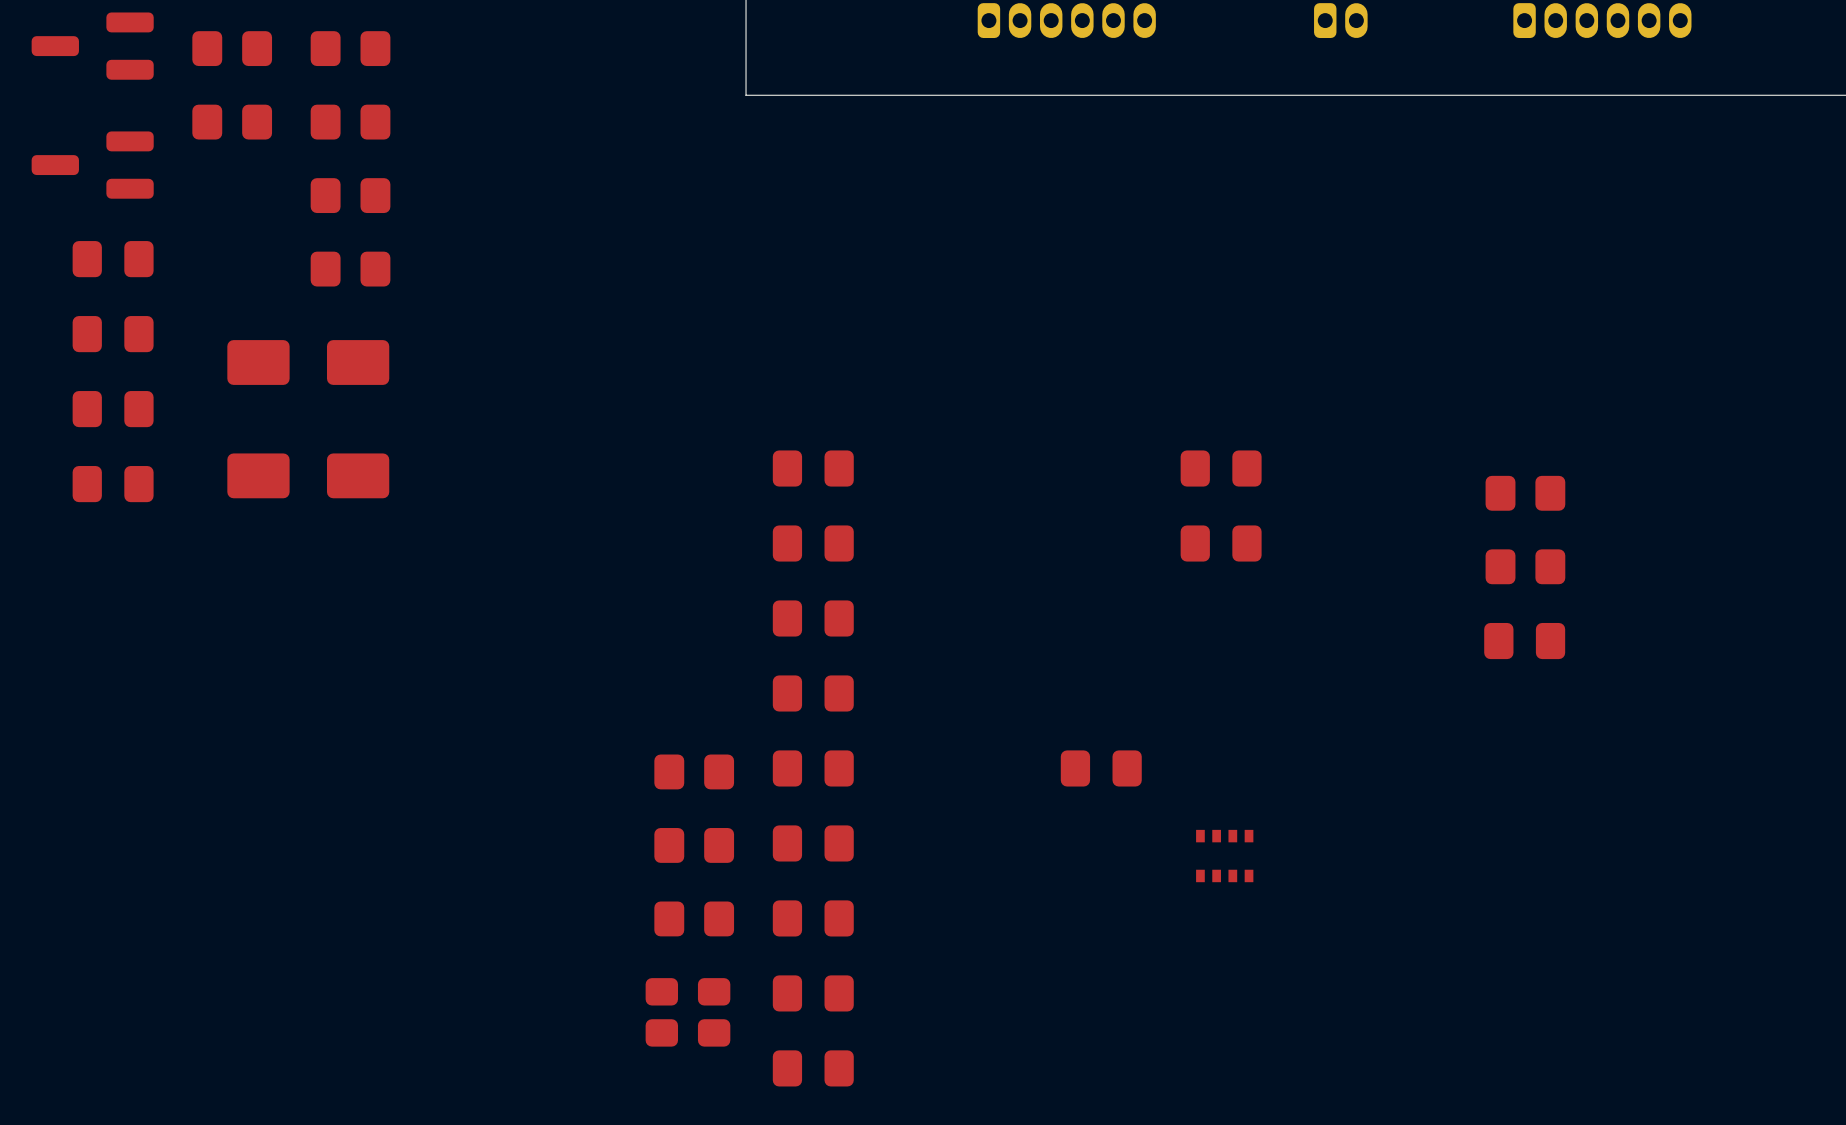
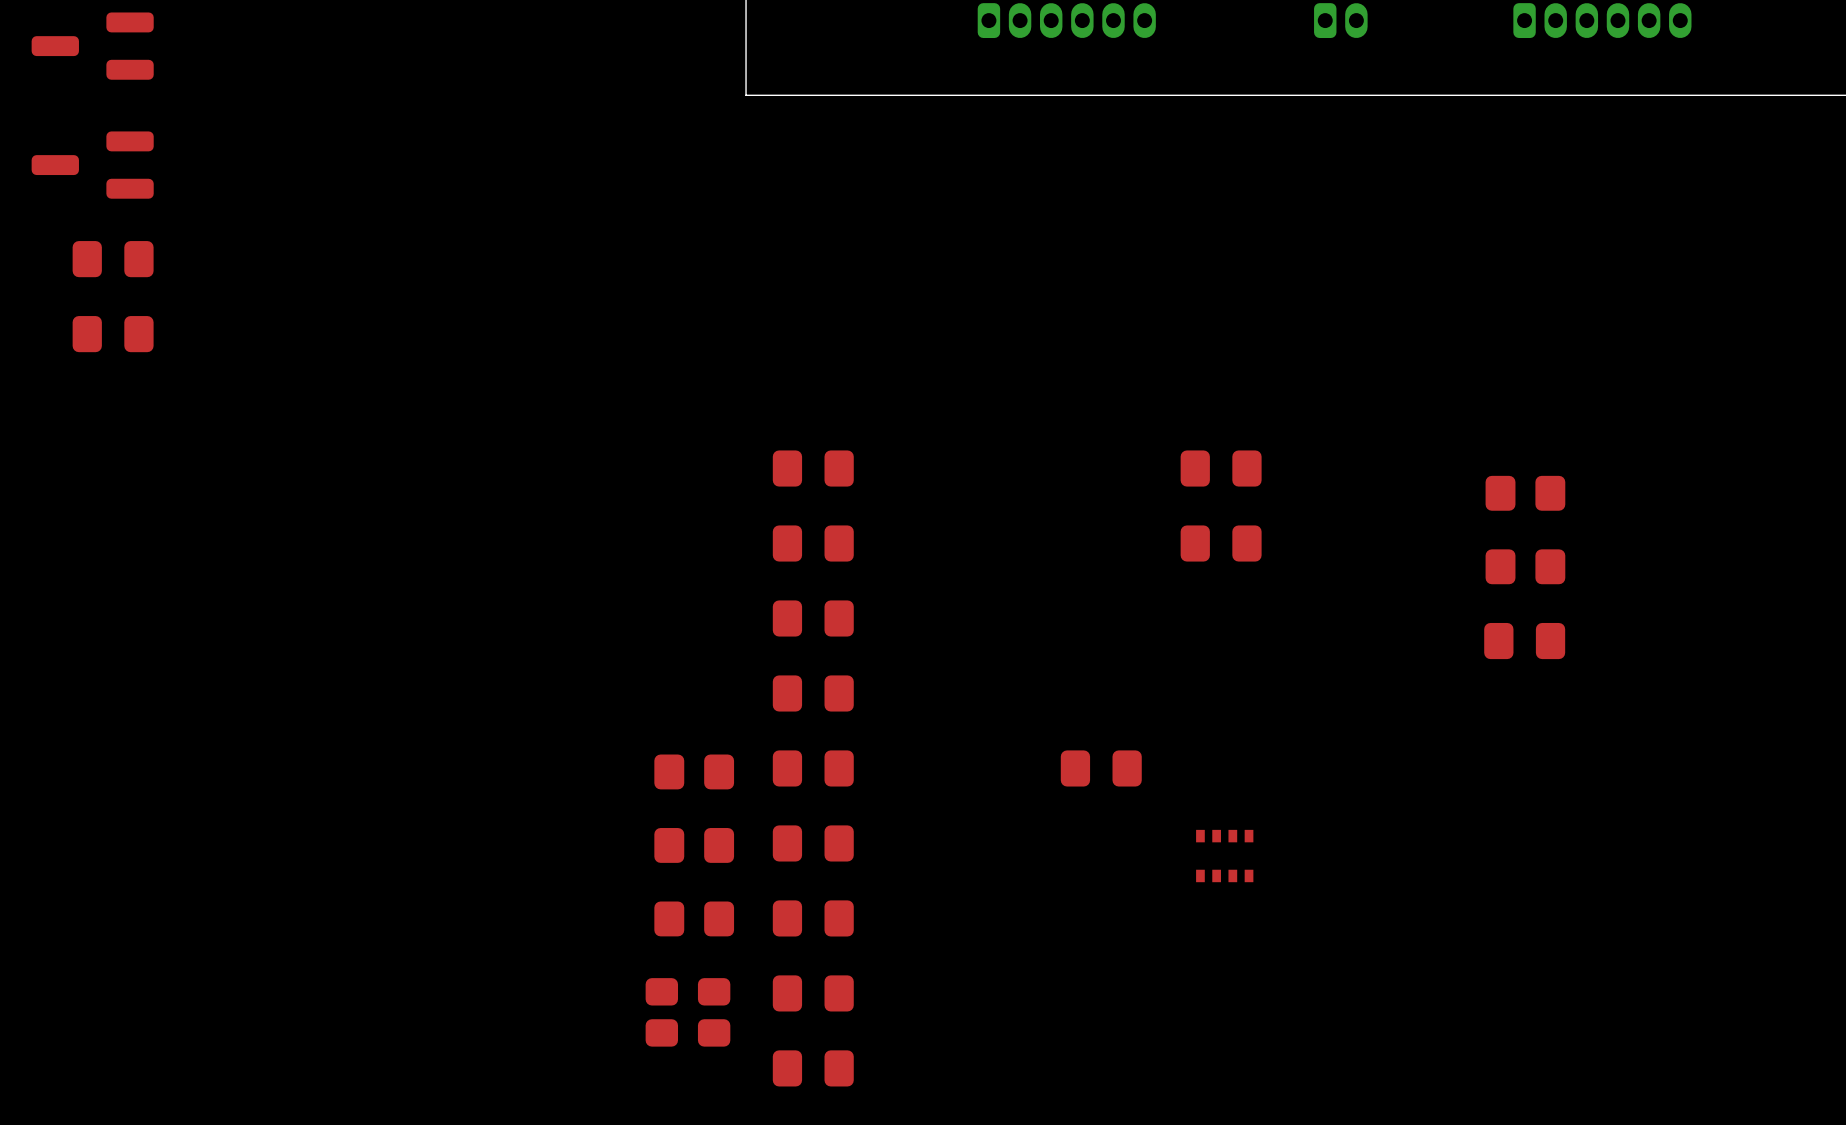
part: (232, 48) -> none
part: (350, 48) -> none
part: (232, 122) -> none
part: (350, 122) -> none
part: (350, 195) -> none
part: (350, 269) -> none
part: (308, 362) -> none
part: (113, 409) -> none
part: (308, 475) -> none
part: (113, 484) -> none

